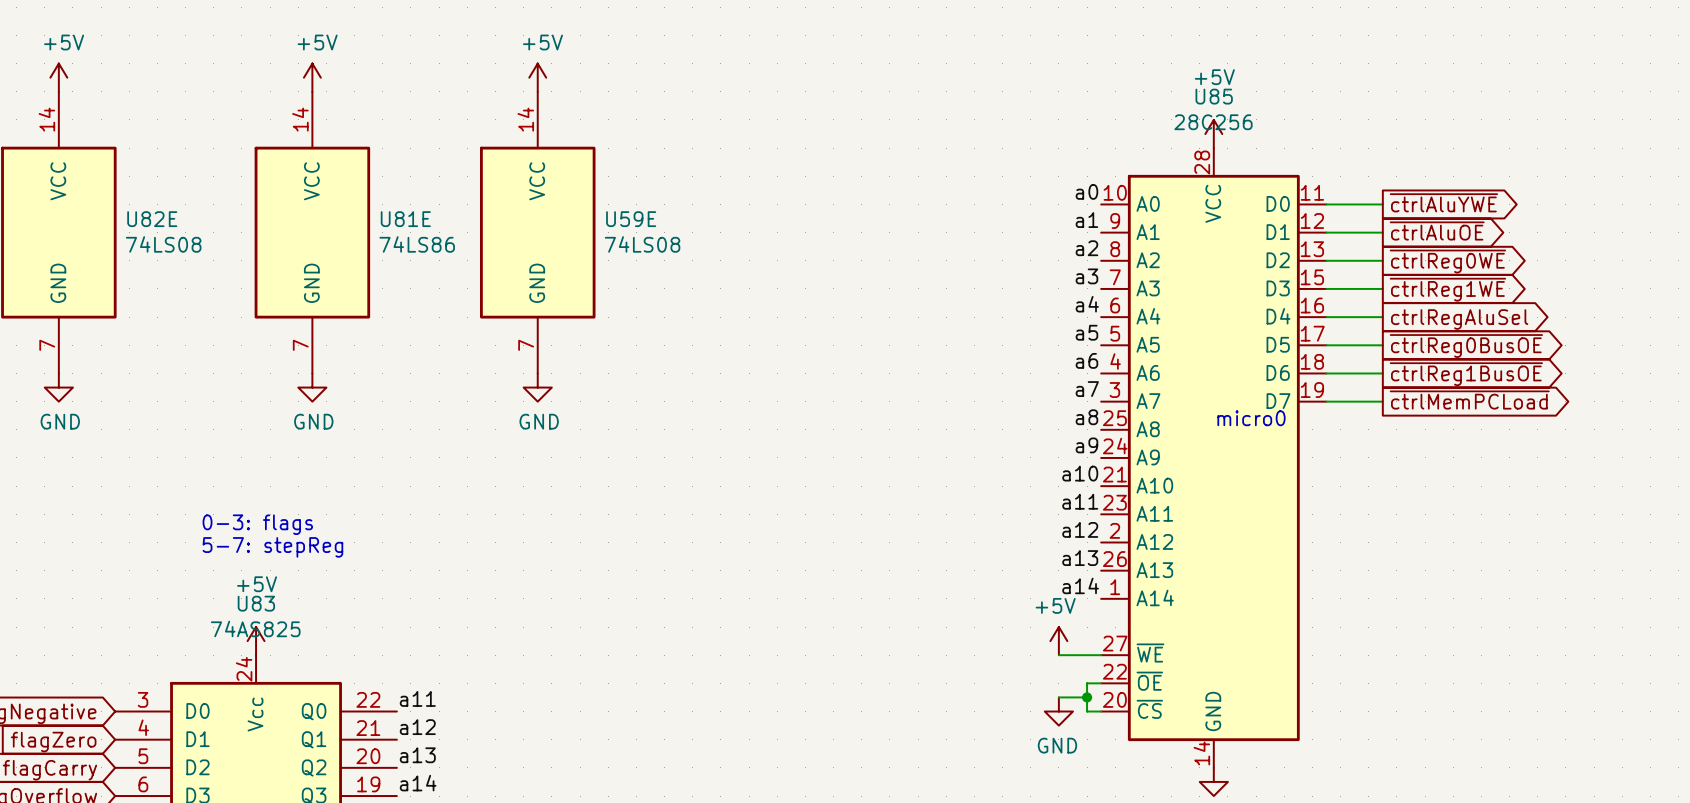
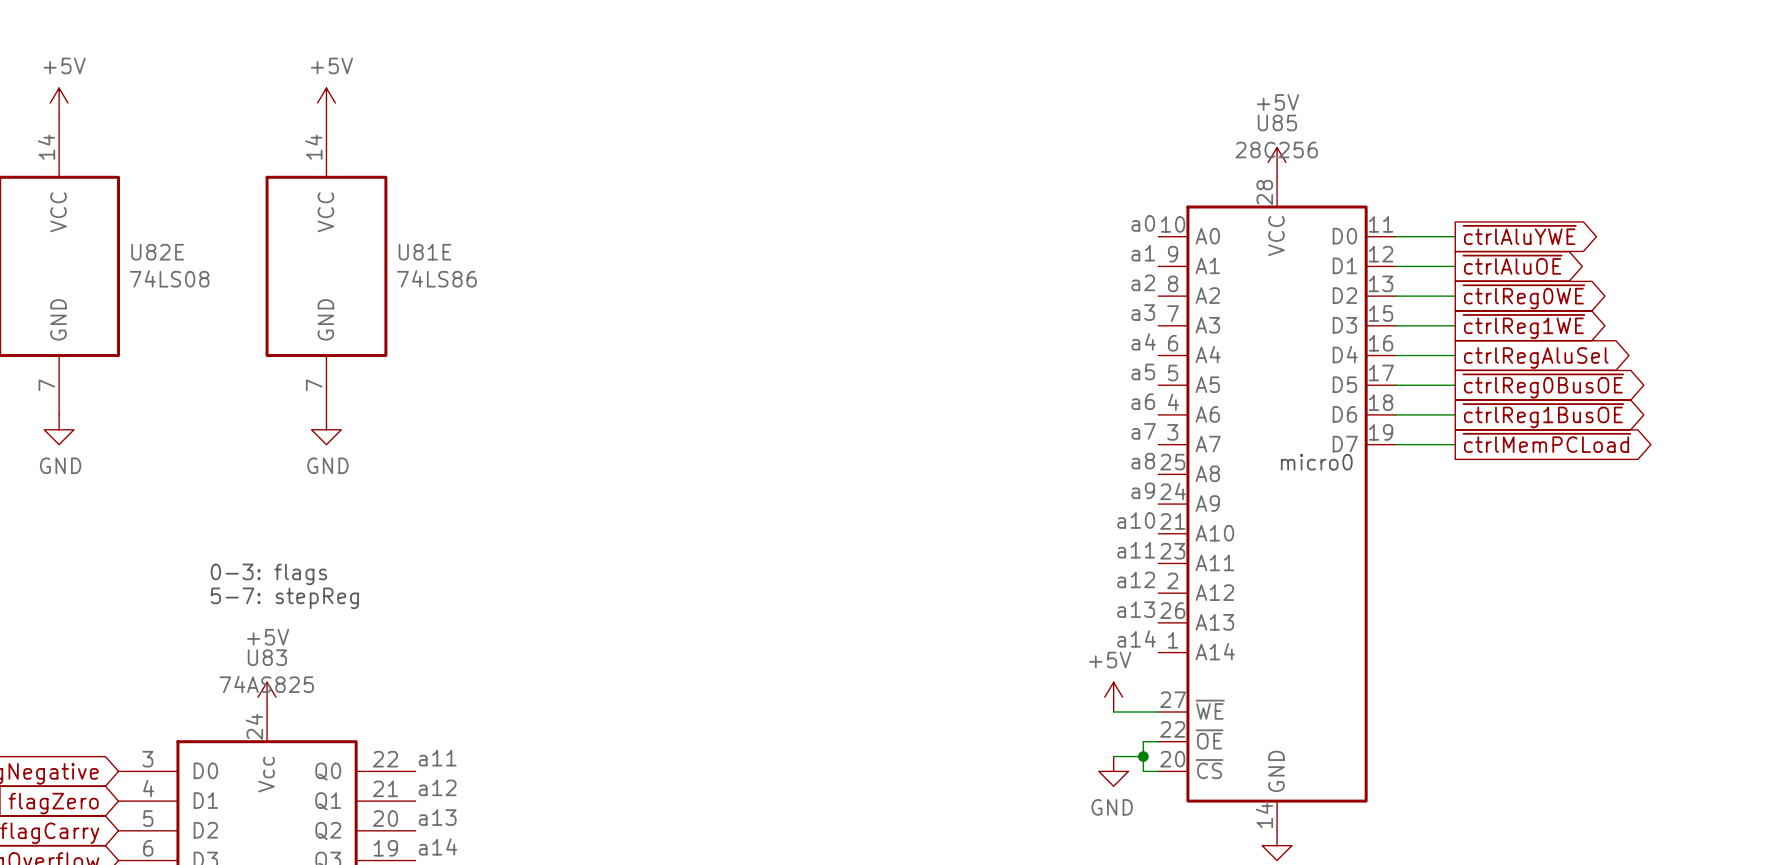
power symbol: +5V (537, 77) -> none
U59E: 74LS08 (537, 232) -> none
power symbol: GND (537, 387) -> none

